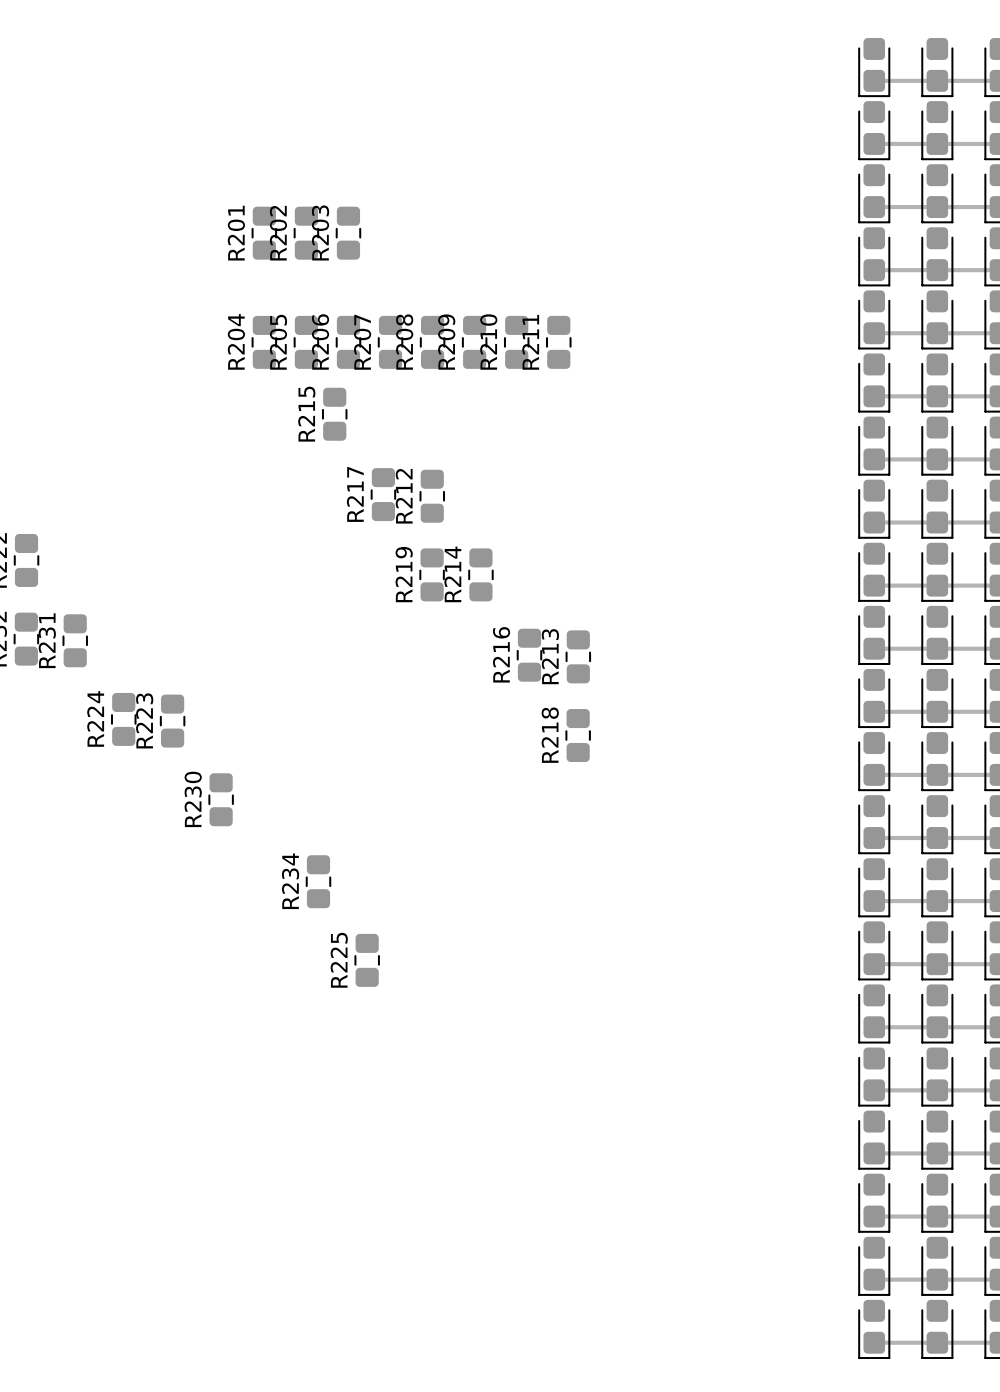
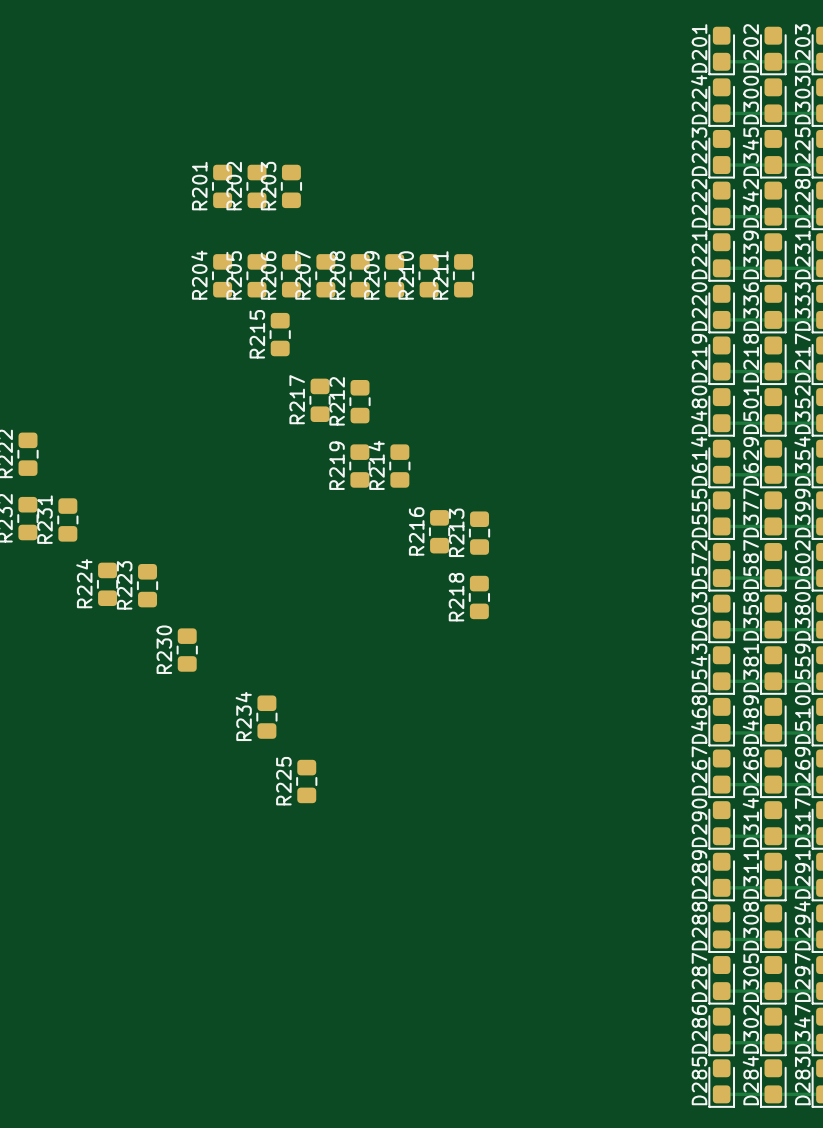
D201 name: none -> D201 (699, 48)
D202 name: none -> D202 (751, 48)
D203 name: none -> D203 (802, 48)
D224 name: none -> D224 (699, 99)
D300 name: none -> D300 (751, 100)
D303 name: none -> D303 (802, 100)
D223 name: none -> D223 (699, 151)
D345 name: none -> D345 (750, 151)
D225 name: none -> D225 (802, 151)
D228 name: none -> D228 (802, 203)
D222 name: none -> D222 (699, 203)
D342 name: none -> D342 (750, 203)
D339 name: none -> D339 (751, 254)
D221 name: none -> D221 (699, 254)
D231 name: none -> D231 (802, 254)
D336 name: none -> D336 (751, 306)
D220 name: none -> D220 (699, 306)
D333 name: none -> D333 (802, 306)
D219 name: none -> D219 (699, 358)
D218 name: none -> D218 (751, 358)
D217 name: none -> D217 (802, 357)
D480 name: none -> D480 (699, 409)
D501 name: none -> D501 (751, 409)
D352 name: none -> D352 (802, 409)
D614 name: none -> D614 (699, 461)
D629 name: none -> D629 (751, 461)
D354 name: none -> D354 (802, 461)
D555 name: none -> D555 (699, 513)
D377 name: none -> D377 (751, 512)
D399 name: none -> D399 (802, 513)
D572 name: none -> D572 (699, 564)
D587 name: none -> D587 (751, 564)
D602 name: none -> D602 (802, 564)
D603 name: none -> D603 (699, 616)
D358 name: none -> D358 (751, 616)
D380 name: none -> D380 (802, 616)
D543 name: none -> D543 (699, 667)
D381 name: none -> D381 (751, 667)
D559 name: none -> D559 (802, 667)
D468 name: none -> D468 (699, 719)
D489 name: none -> D489 (750, 719)
D510 name: none -> D510 (802, 719)
D268 name: none -> D268 (751, 771)
D269 name: none -> D269 (802, 771)
D267 name: none -> D267 (699, 770)
D290 name: none -> D290 (699, 822)
D314 name: none -> D314 (750, 822)
D317 name: none -> D317 (802, 822)
D289 name: none -> D289 (699, 874)
D311 name: none -> D311 (751, 874)
D291 name: none -> D291 (802, 874)
D288 name: none -> D288 (699, 926)
D308 name: none -> D308 (751, 926)
D294 name: none -> D294 (802, 925)
D287 name: none -> D287 (699, 977)
D305 name: none -> D305 (751, 977)
D297 name: none -> D297 (802, 977)
D286 name: none -> D286 (699, 1029)
D302 name: none -> D302 (751, 1029)
D347 name: none -> D347 (802, 1029)
D285 name: none -> D285 (699, 1081)
D284 name: none -> D284 (750, 1080)
D283 name: none -> D283 (802, 1081)

